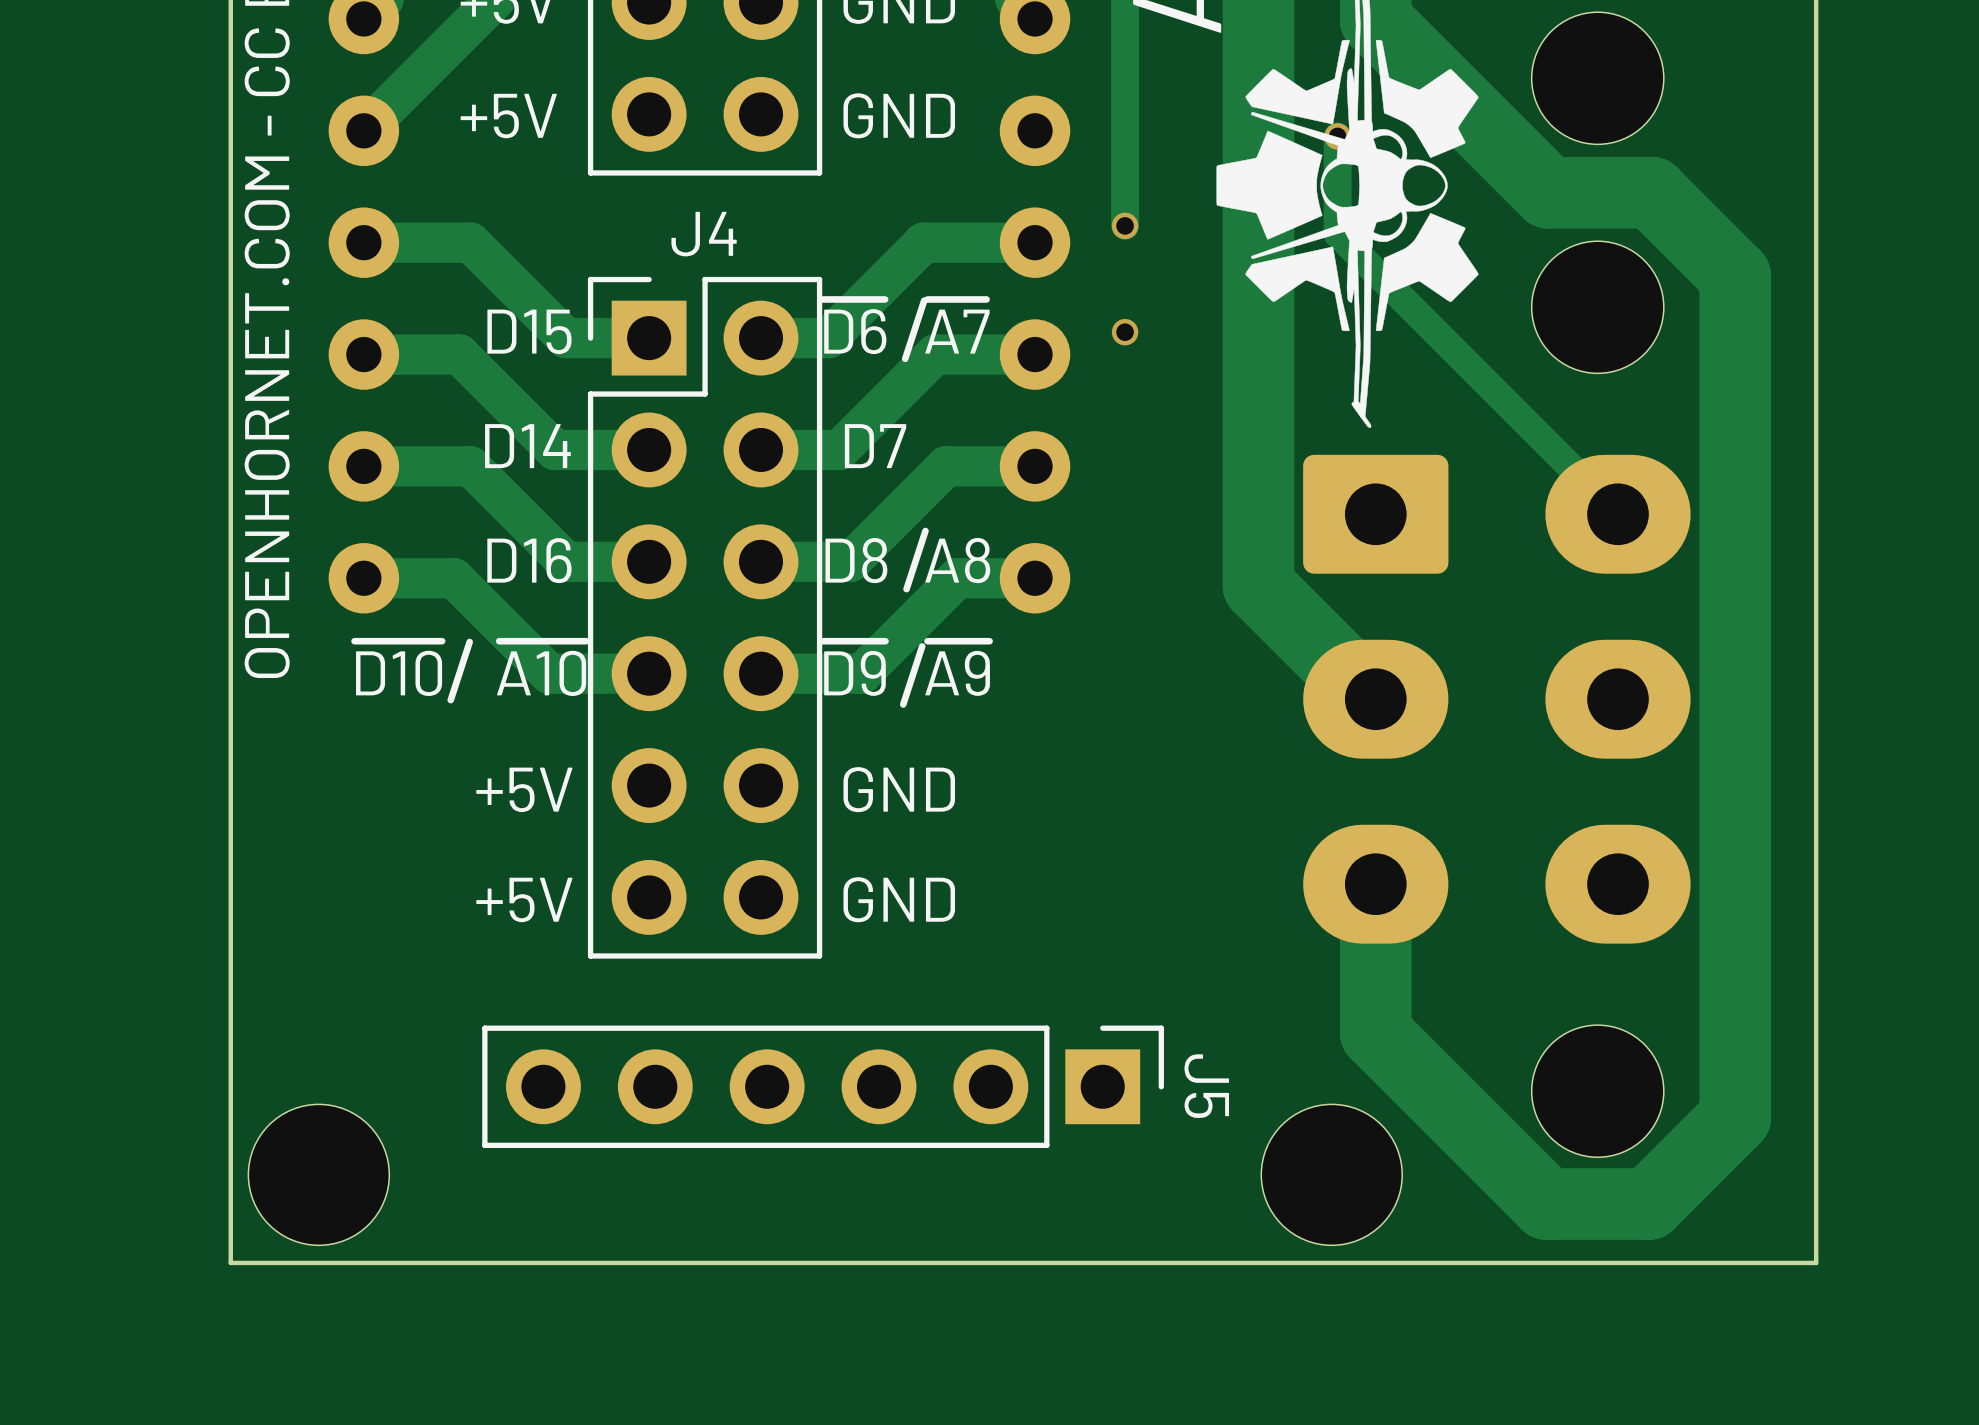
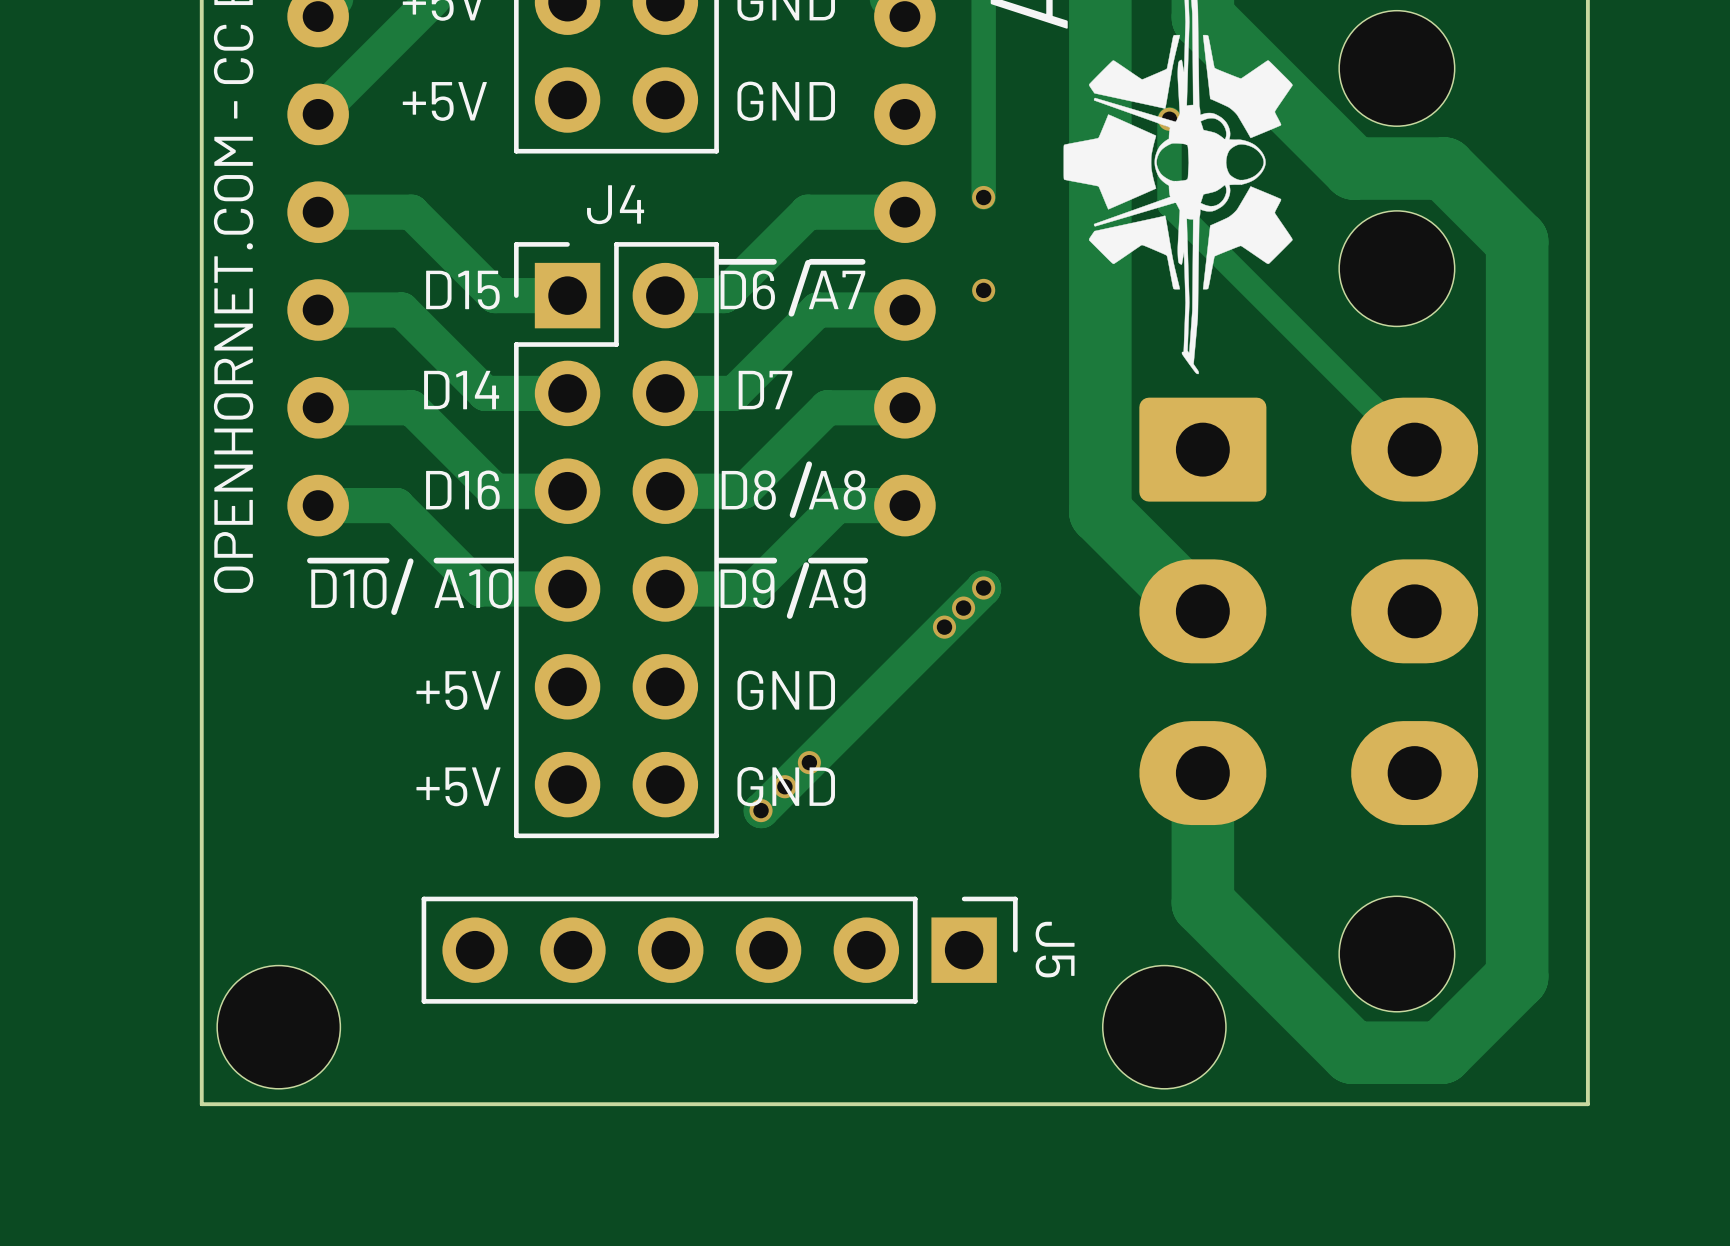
track: none -> (983, 588) (761, 810)
via: none -> (983, 588)
via: none -> (963, 608)
via: none -> (944, 627)
via: none -> (809, 762)
via: none -> (784, 786)
via: none -> (761, 810)

